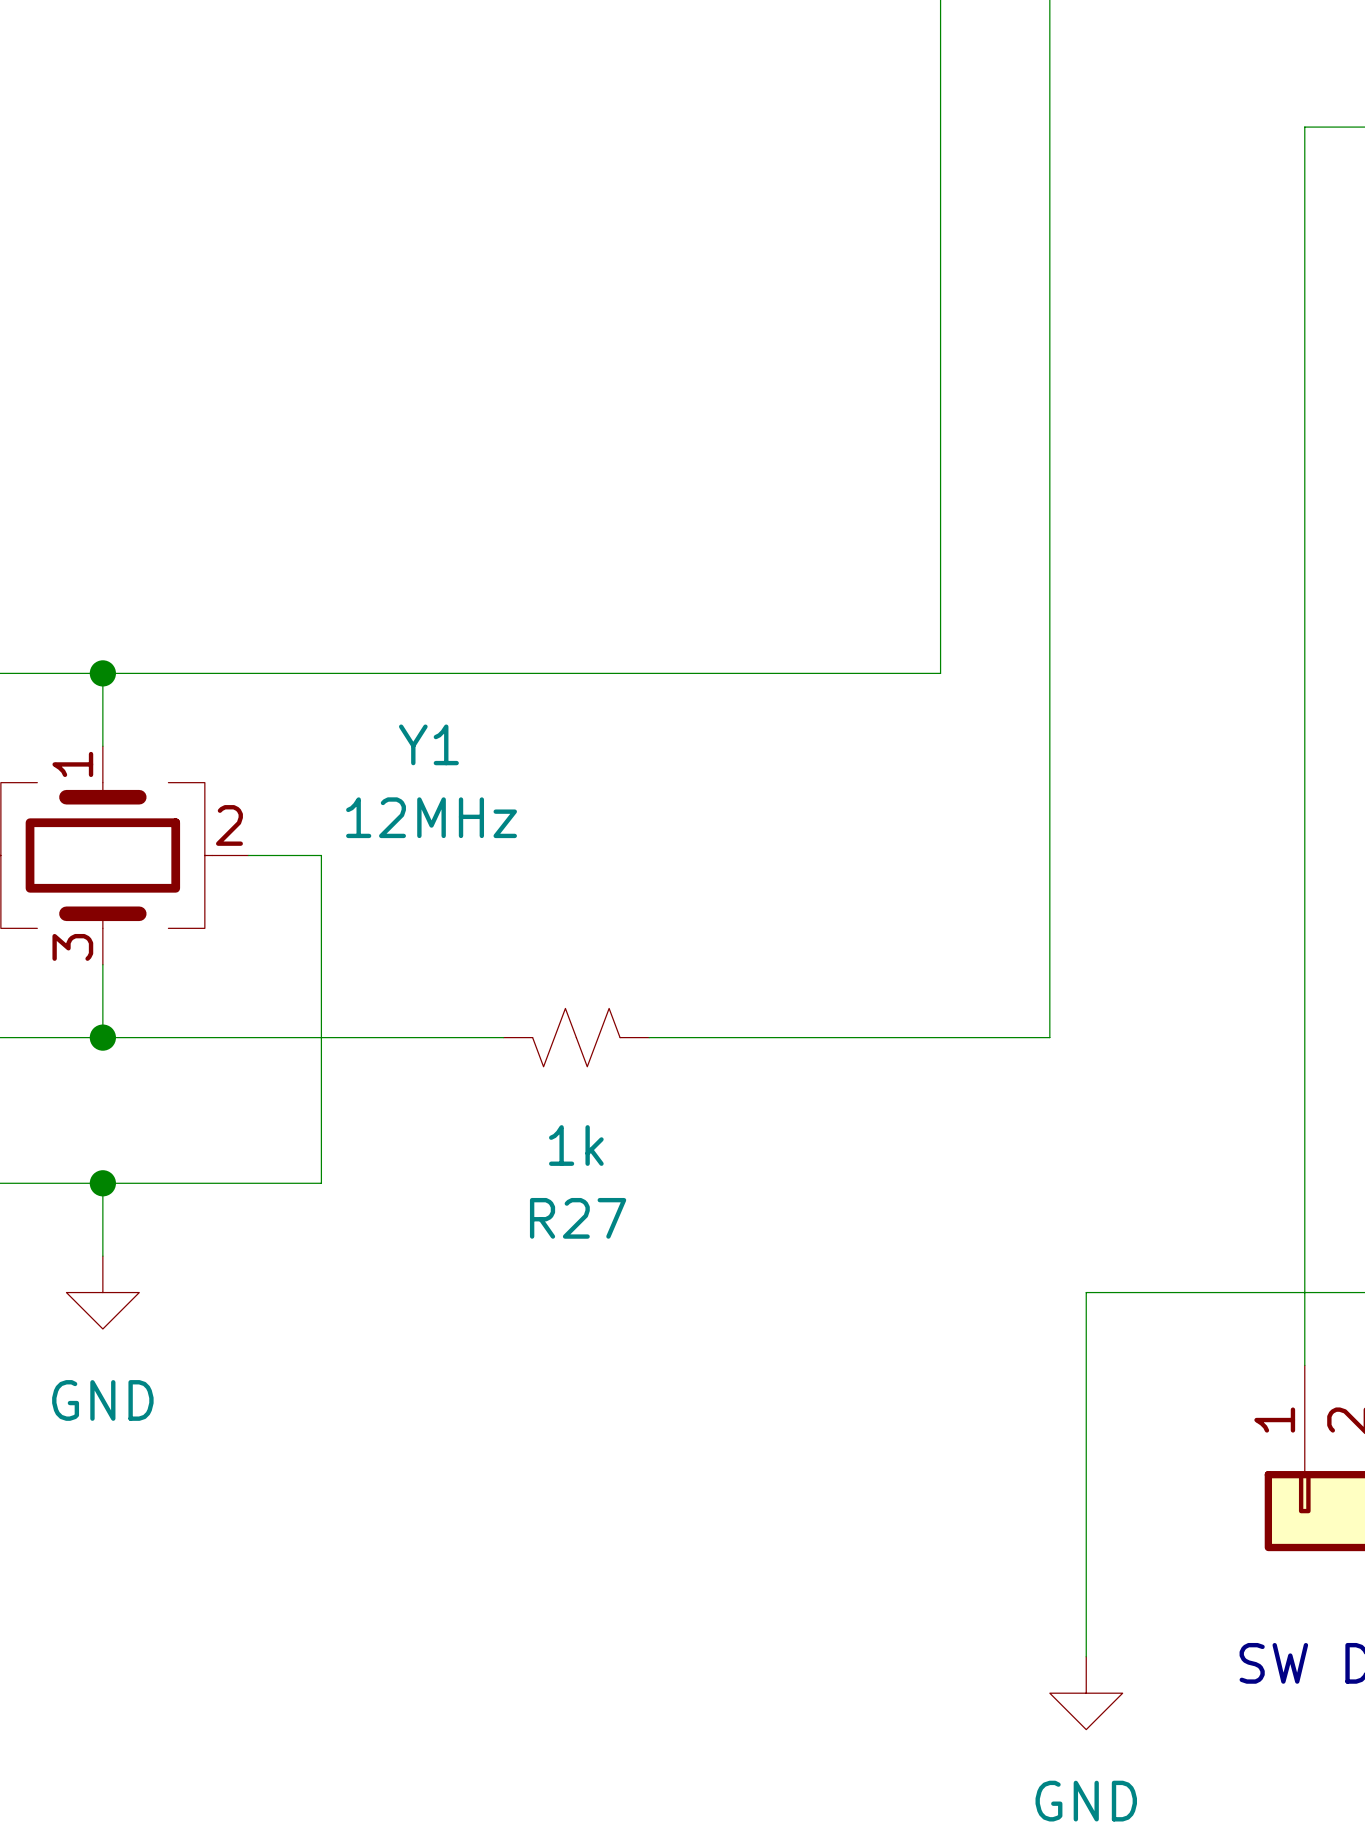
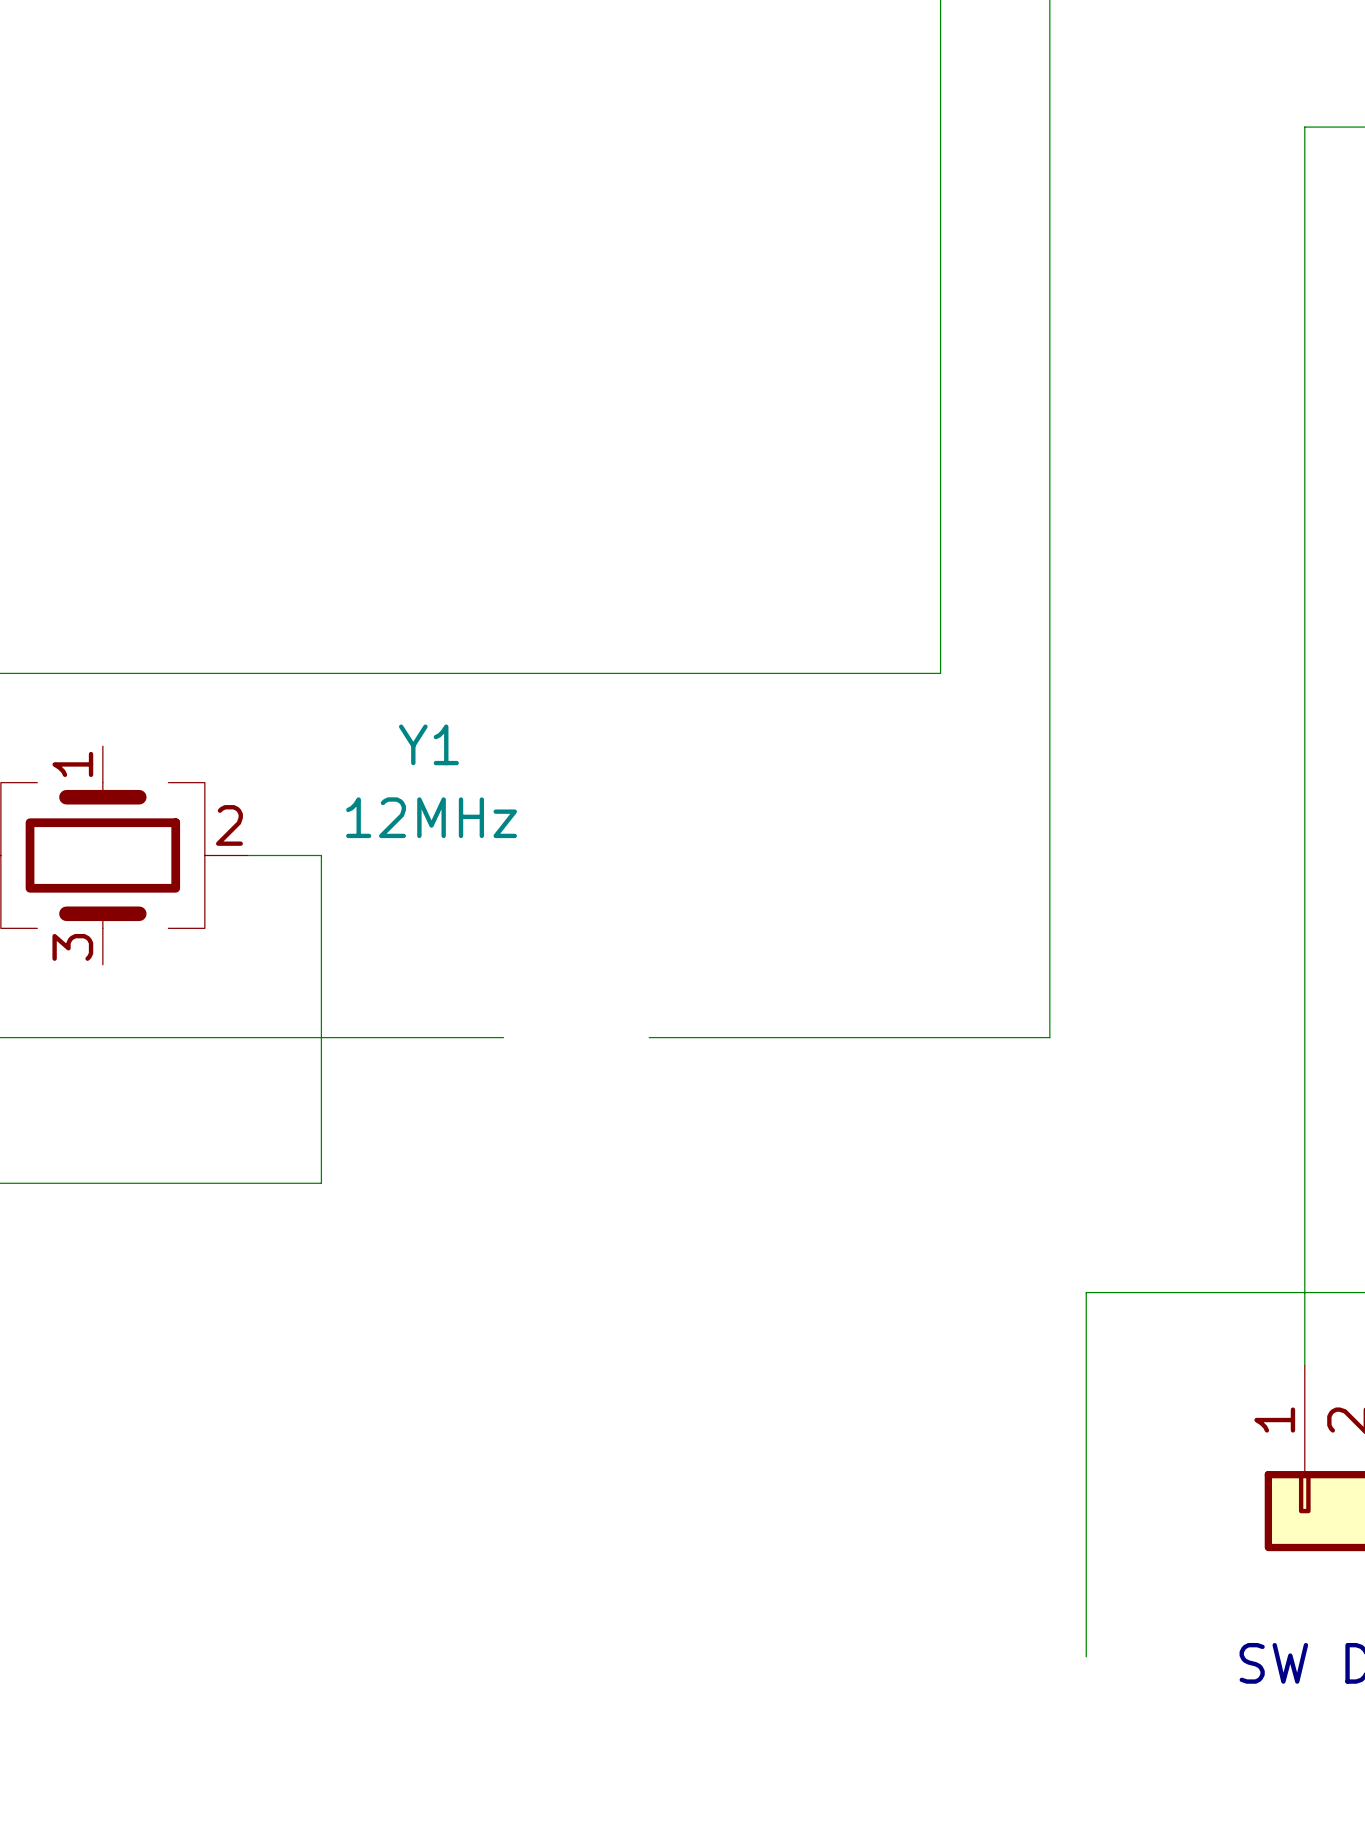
wire: (102, 673) (102, 746) -> none
junction: (102, 673) -> none
wire: (102, 964) (102, 1037) -> none
junction: (102, 1037) -> none
R27: 1k (576, 1037) -> none
wire: (102, 1183) (102, 1256) -> none
junction: (102, 1183) -> none
power symbol: GND (102, 1292) -> none
power symbol: GND (1086, 1693) -> none

